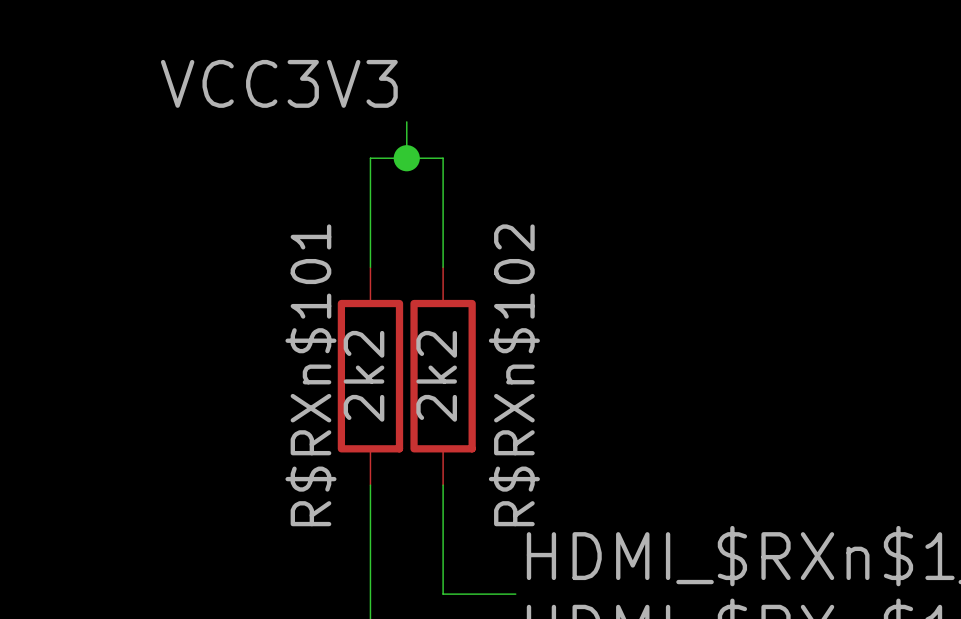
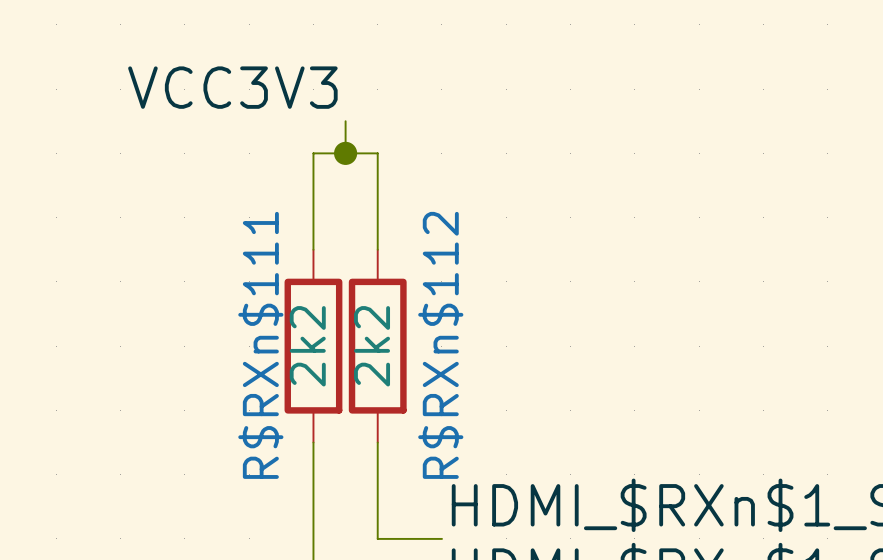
R$RXn$101 name: R$RXn$101 (310, 375) -> R$RXn$111 (260, 345)
R$RXn$102 name: R$RXn$102 (514, 375) -> R$RXn$112 (440, 345)

